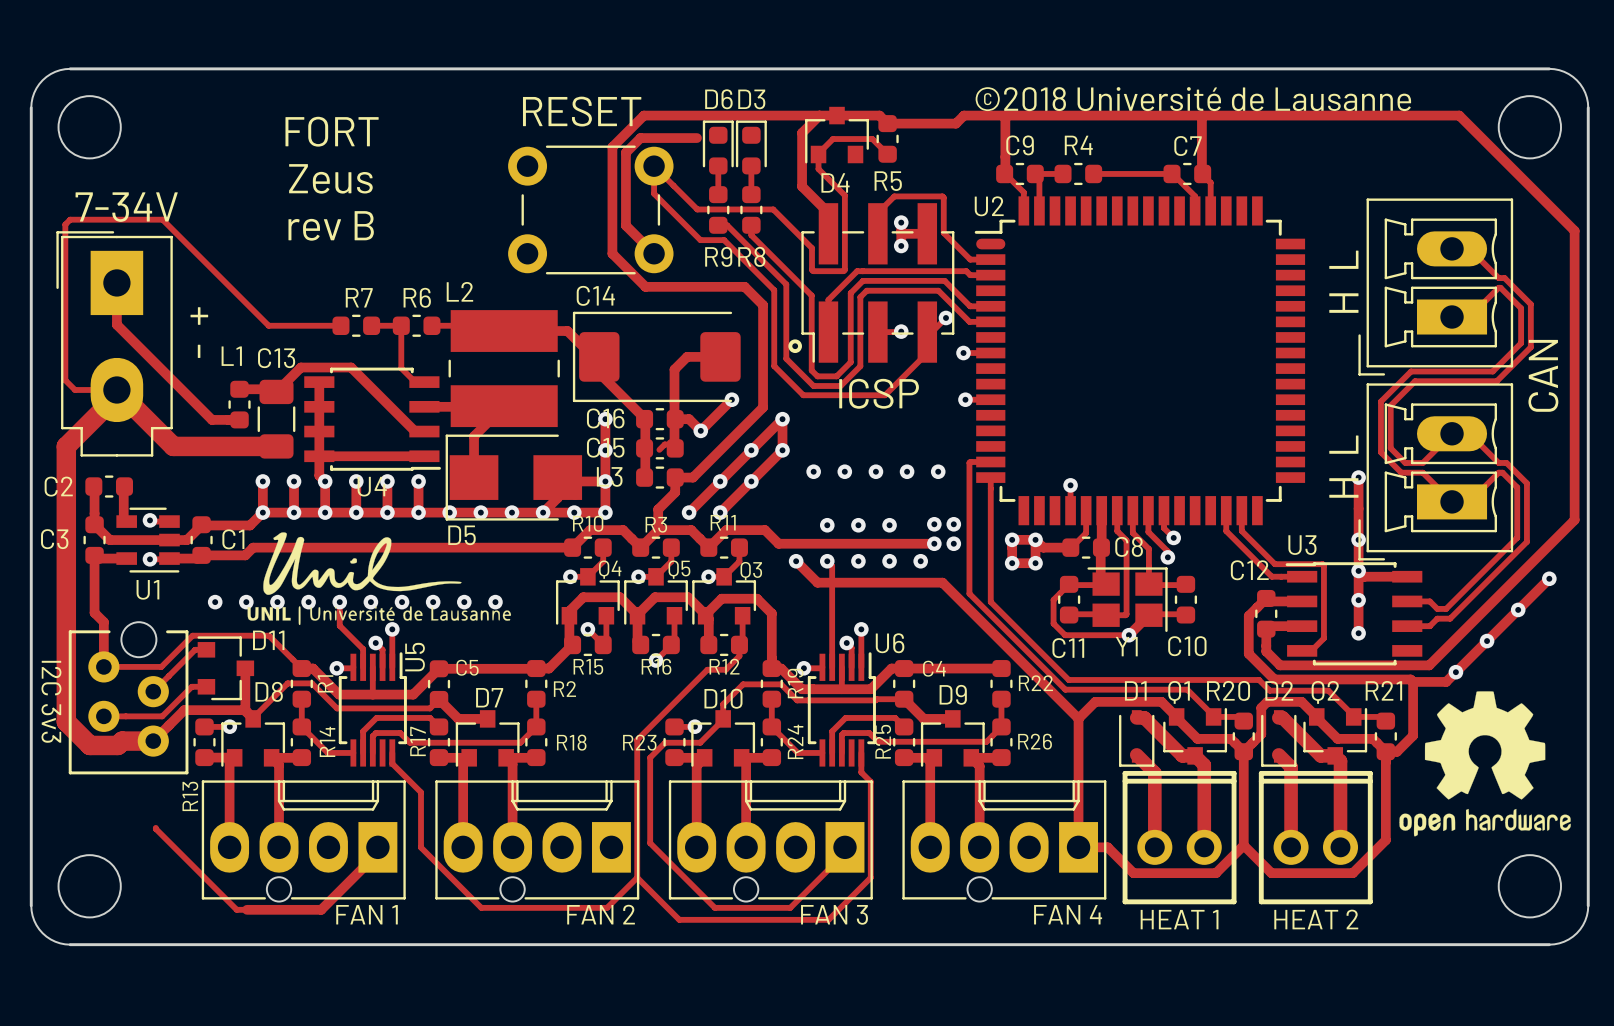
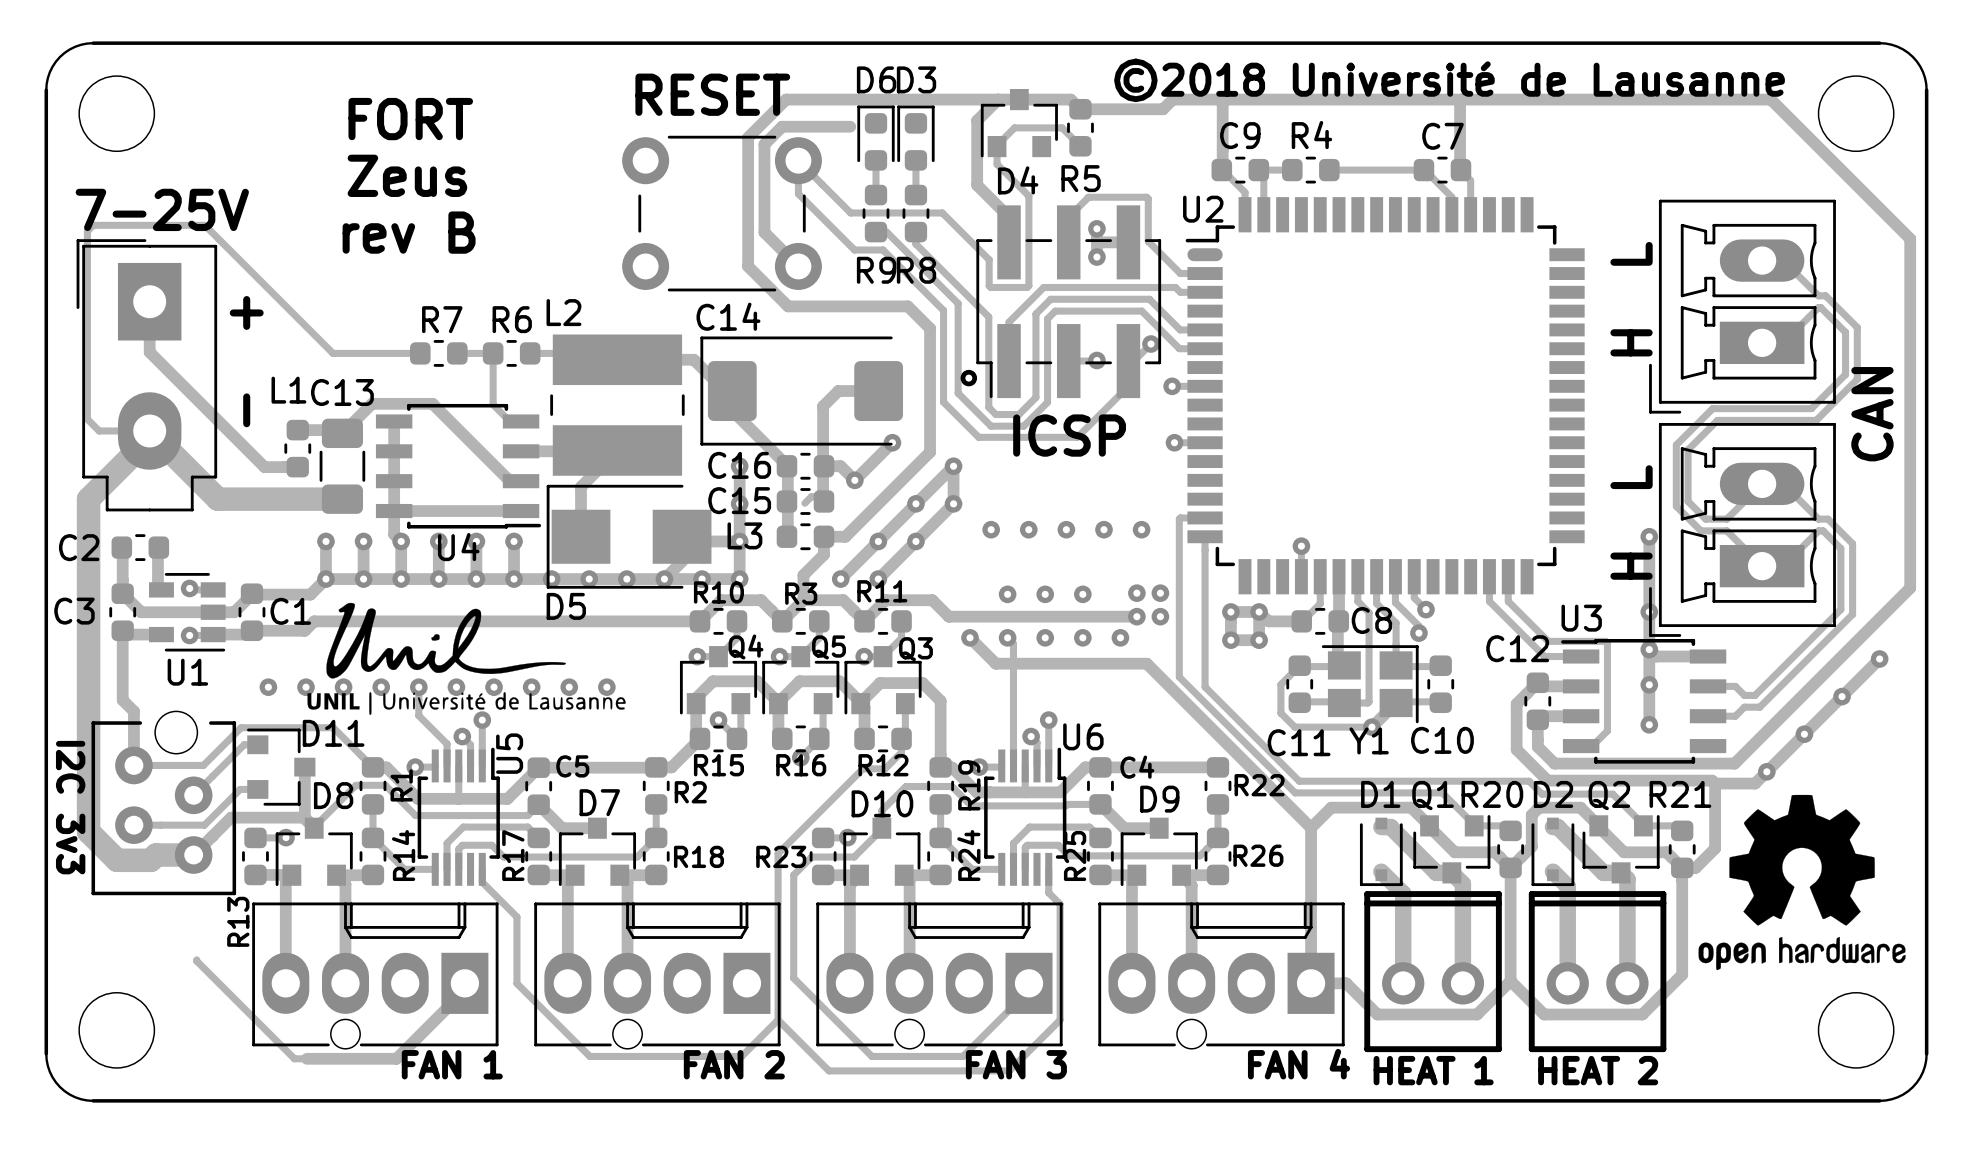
text: 7-34V (126, 207) -> 7-25V (162, 209)

